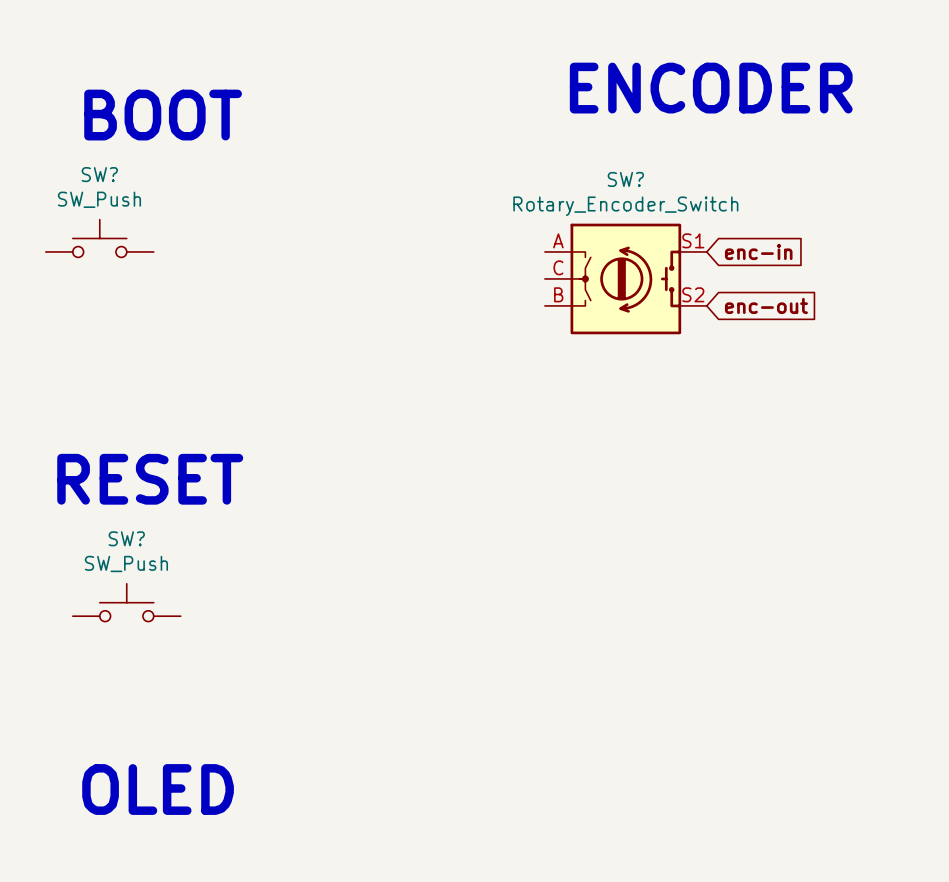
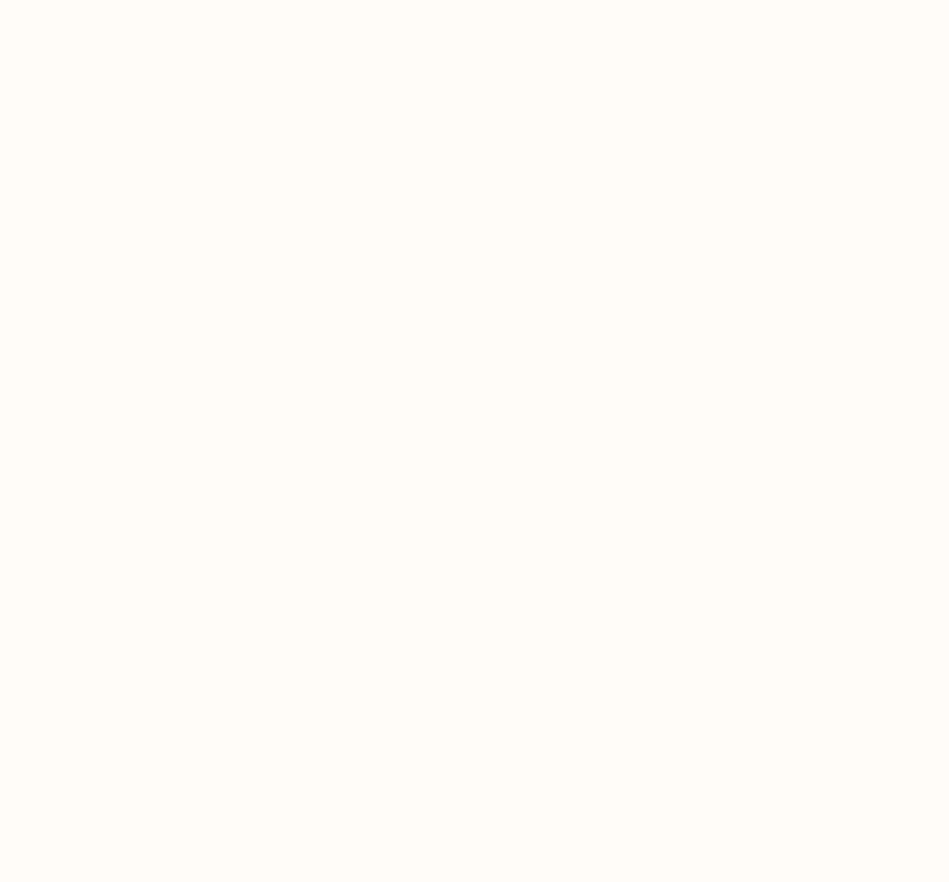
text: ENCODER (711, 88) -> none
text: BOOT (163, 115) -> none
SW?: SW_Push (99, 238) -> none
global label: enc-in (758, 251) -> none
SW?: Rotary_Encoder_Switch (625, 278) -> none
global label: enc-out (766, 305) -> none
text: RESET (150, 479) -> none
SW?: SW_Push (126, 602) -> none
text: OLED (158, 789) -> none

